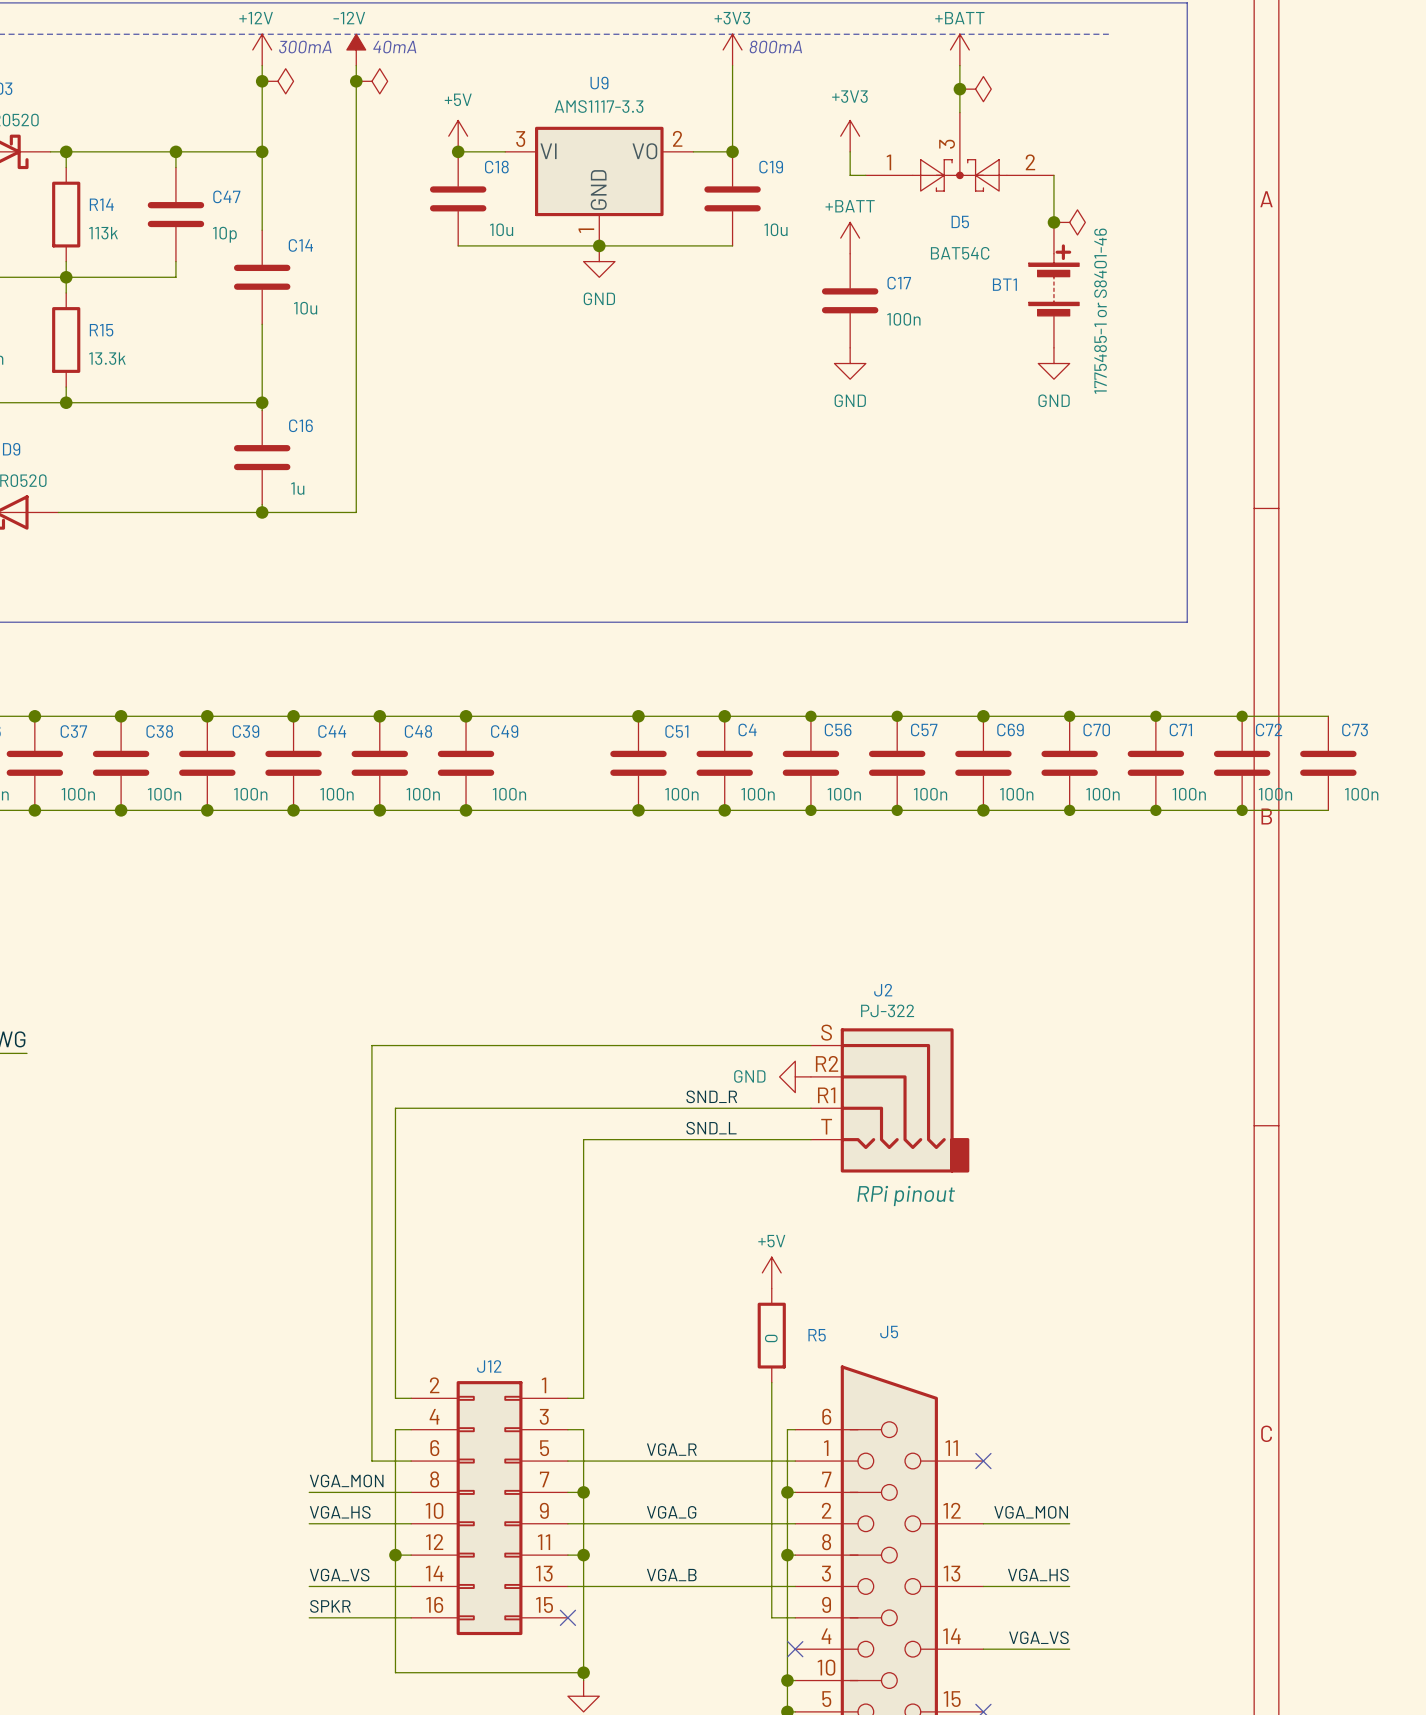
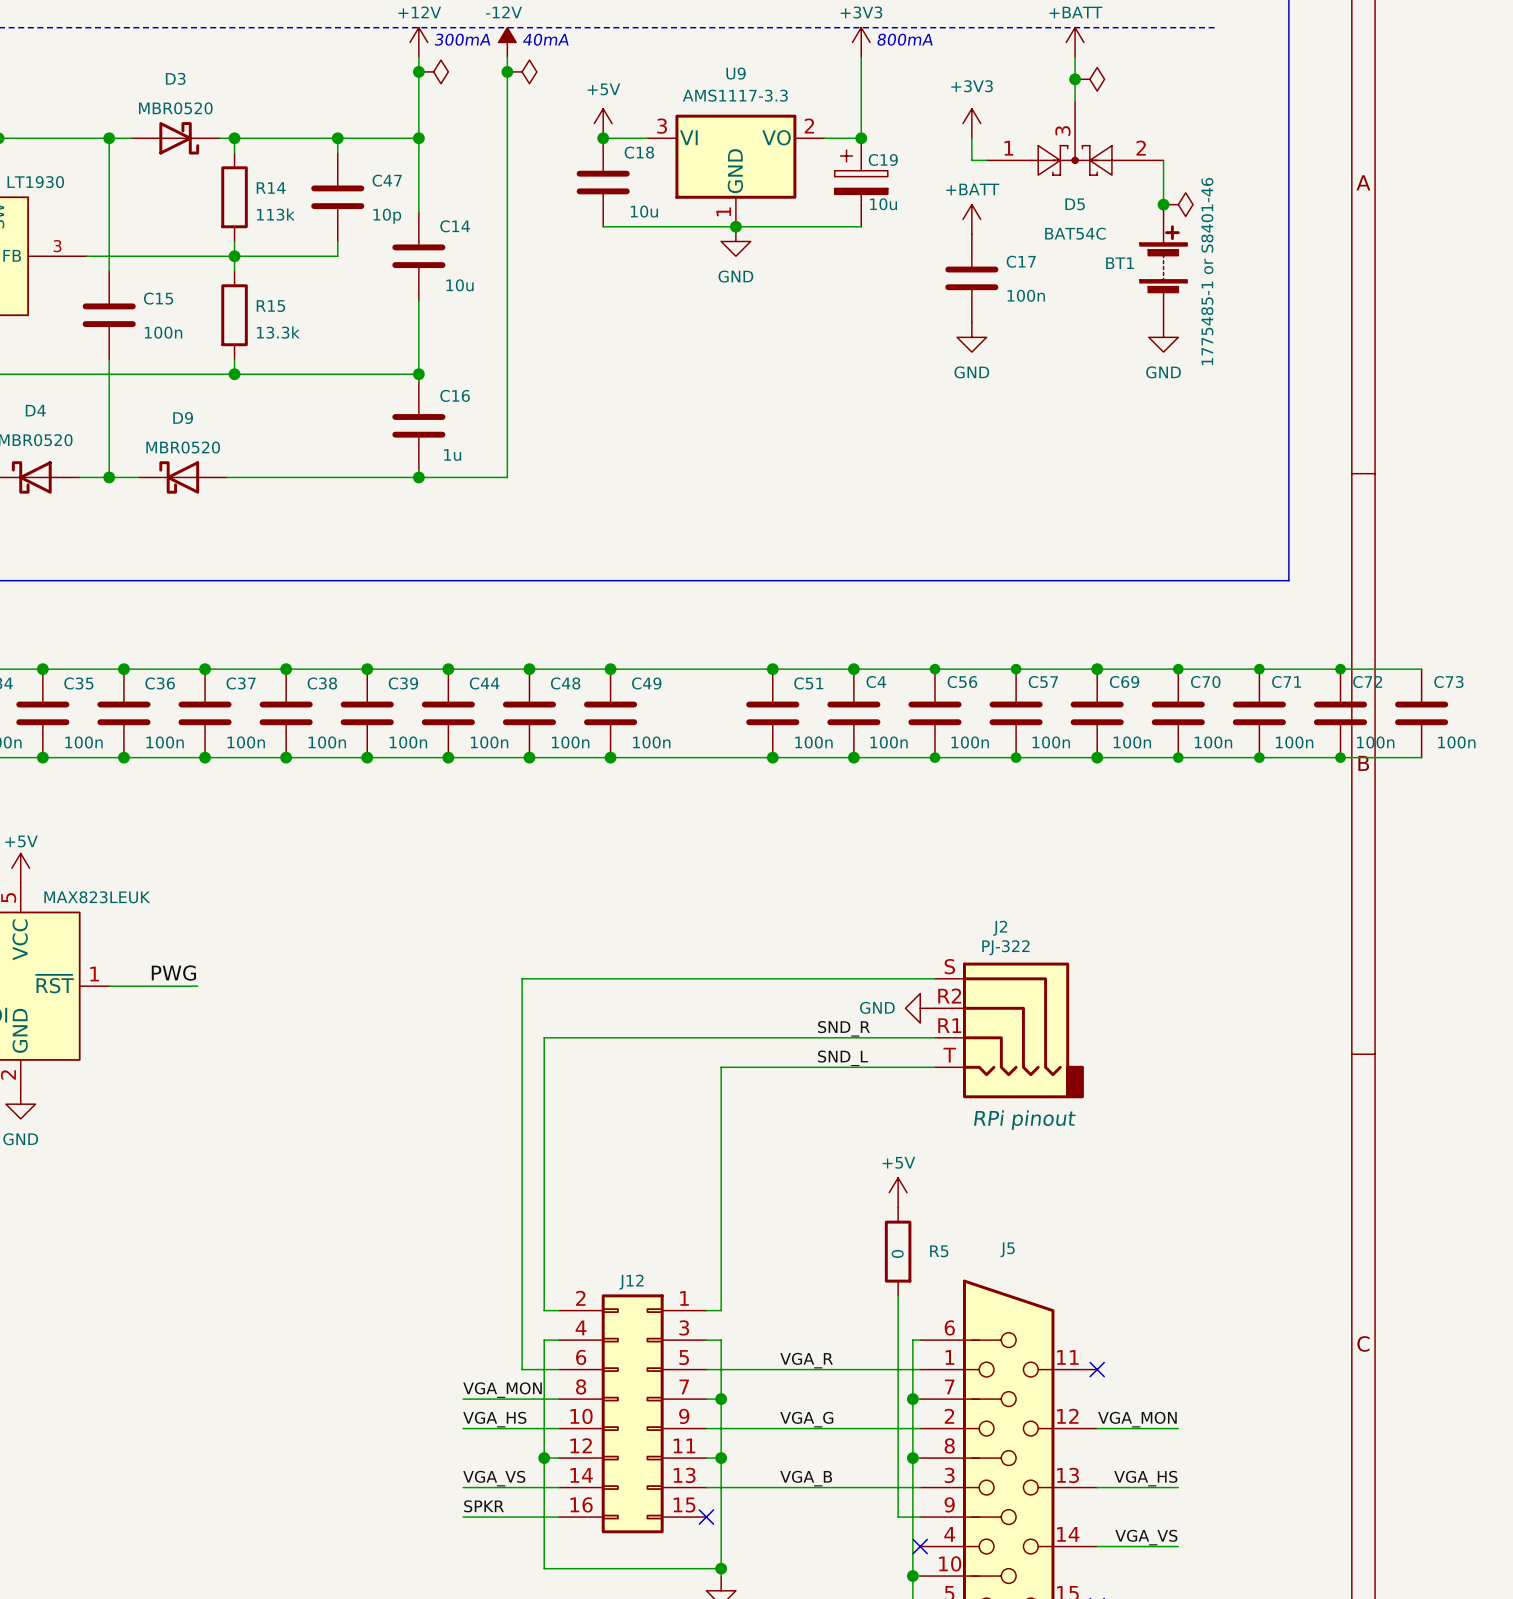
C19 symbol: [704, 151, 761, 246] -> [834, 138, 888, 227]

